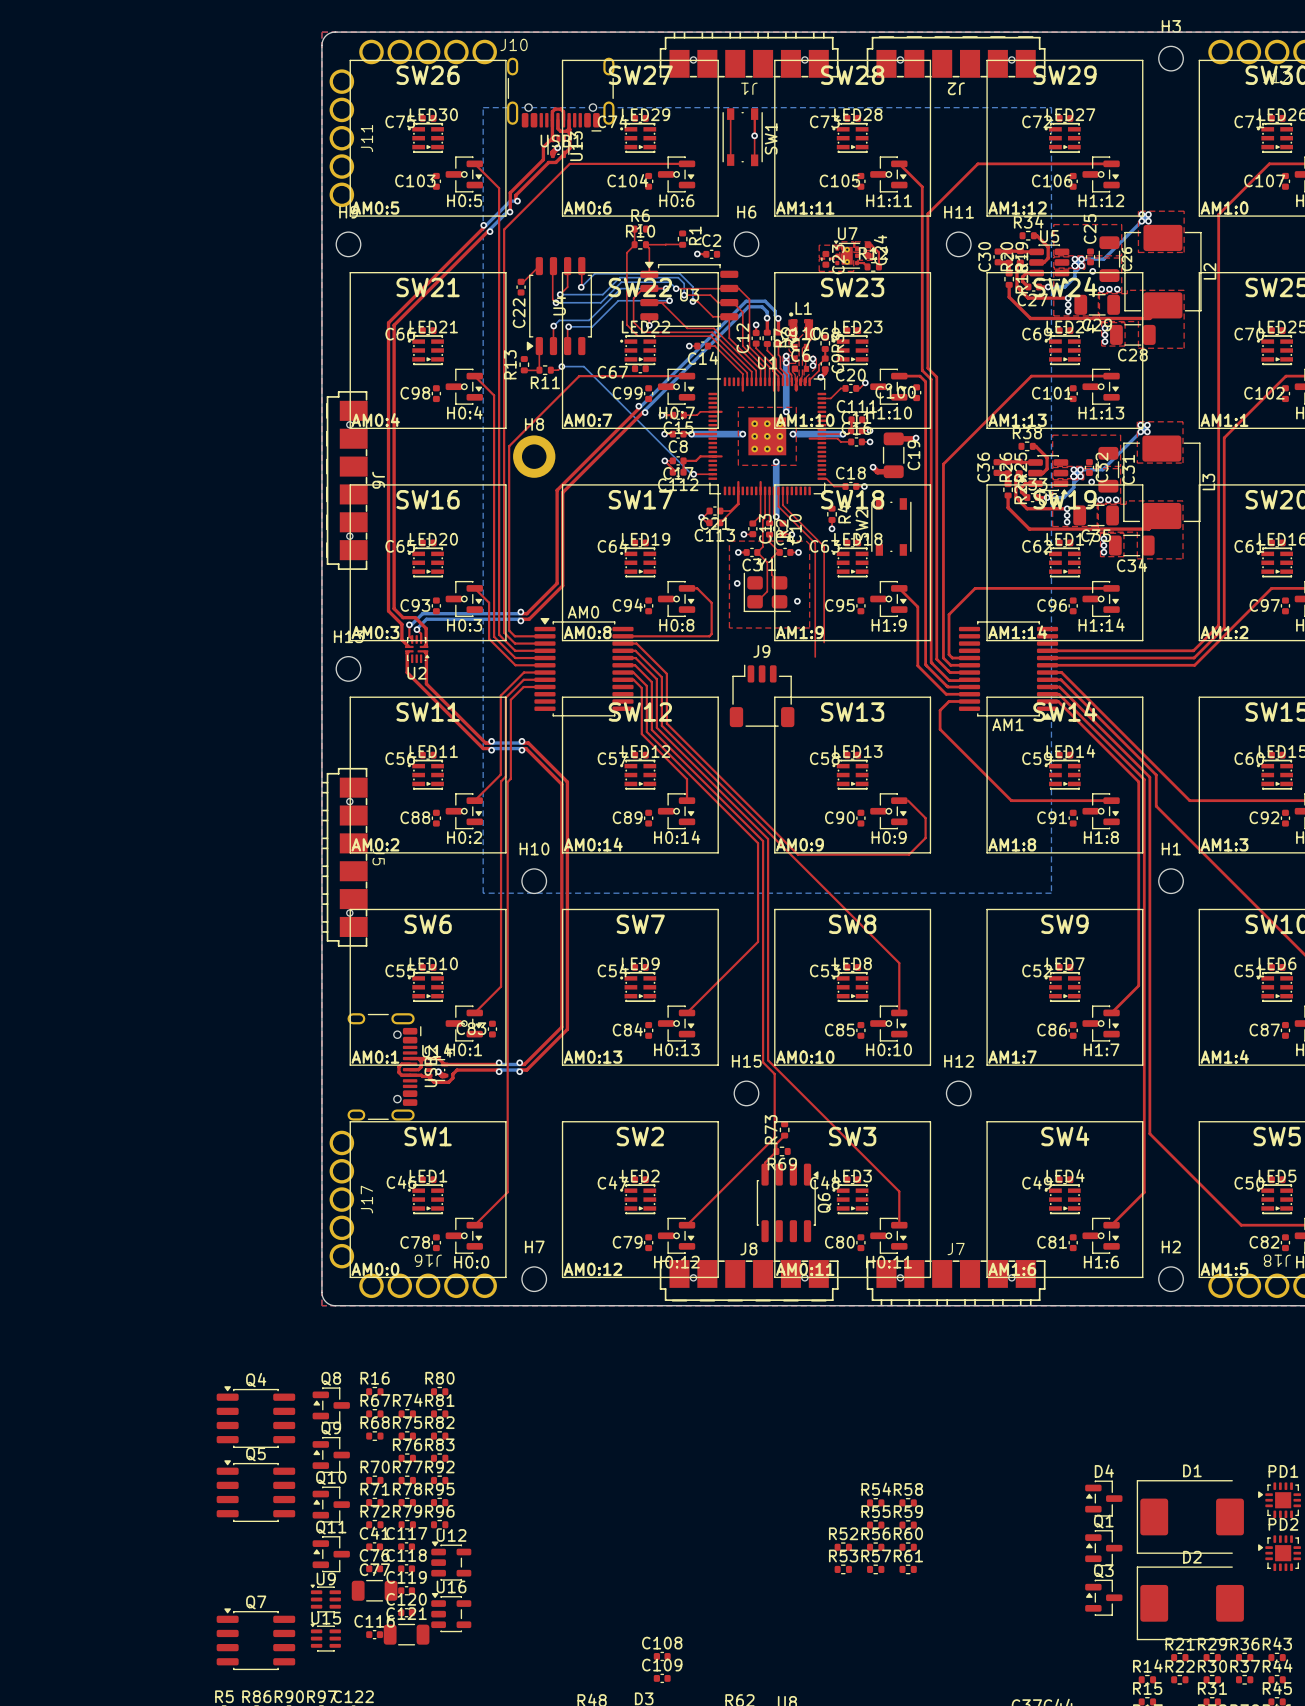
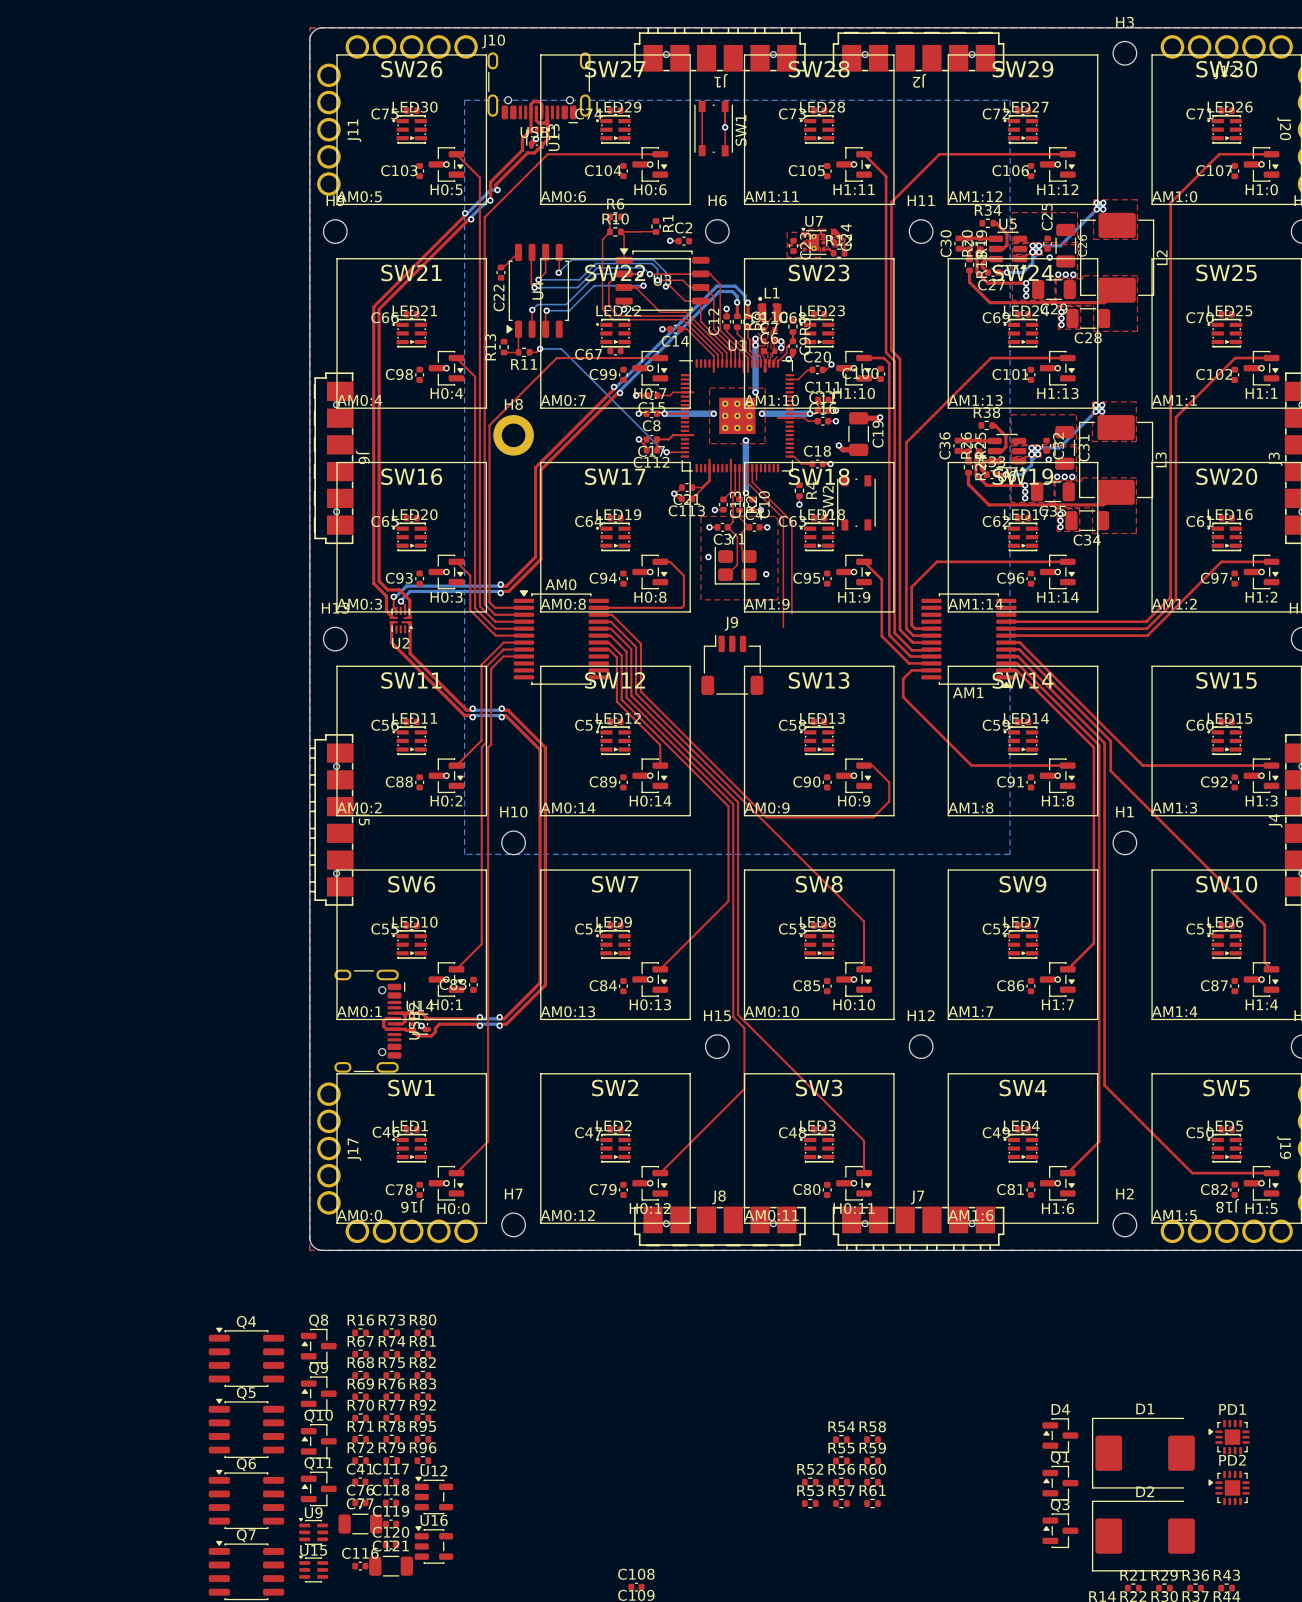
R73 rotation: 0° (784, 1129) -> 90° clockwise (391, 1332)
R73 position: (784, 1129) -> (391, 1332)
top track: (784, 1135) (776, 1143) (776, 1151) (765, 1162) (765, 1174) -> none
R69 position: (782, 1151) -> (360, 1396)
R69 name position: R69 (782, 1164) -> R69 (360, 1383)
Q6 rotation: 0° (787, 1202) -> 90° counterclockwise (246, 1499)
Q6 position: (787, 1202) -> (246, 1499)

